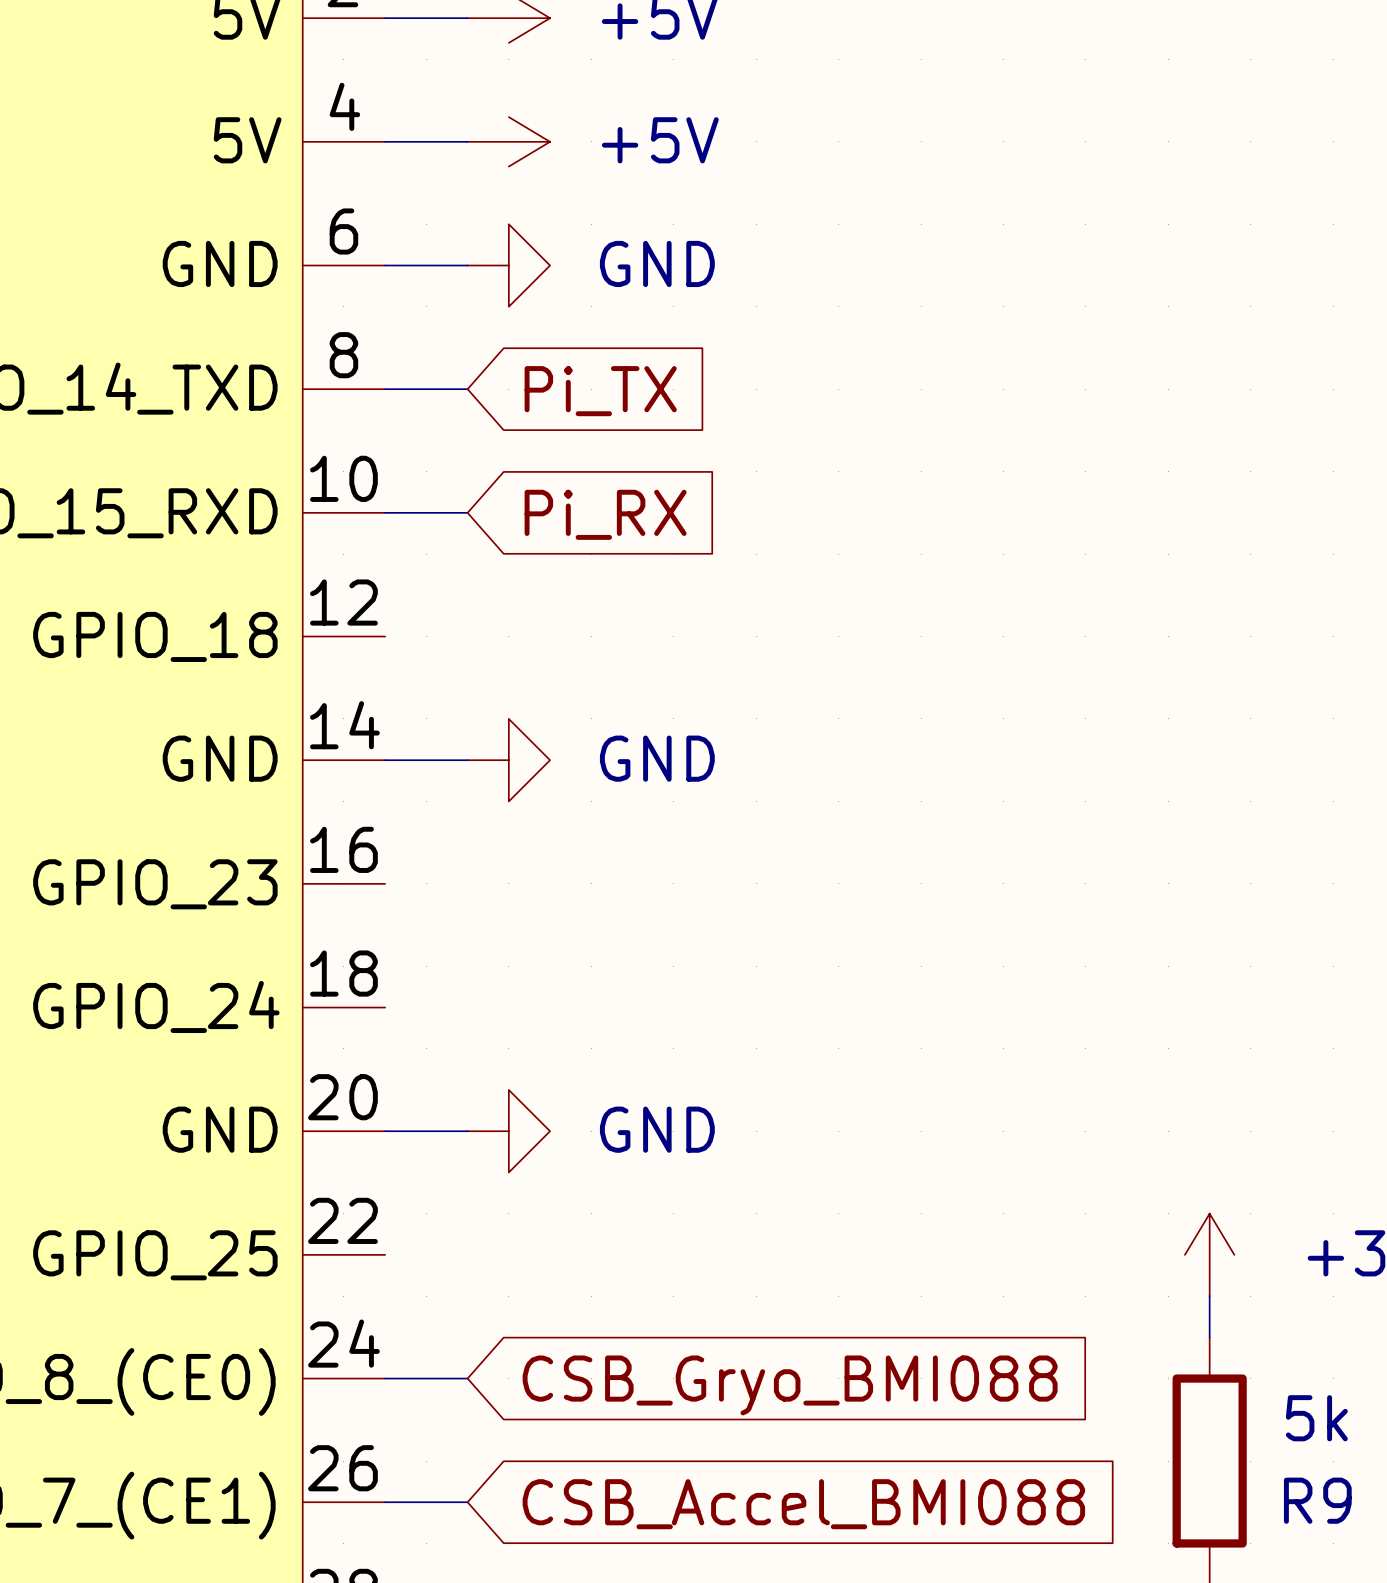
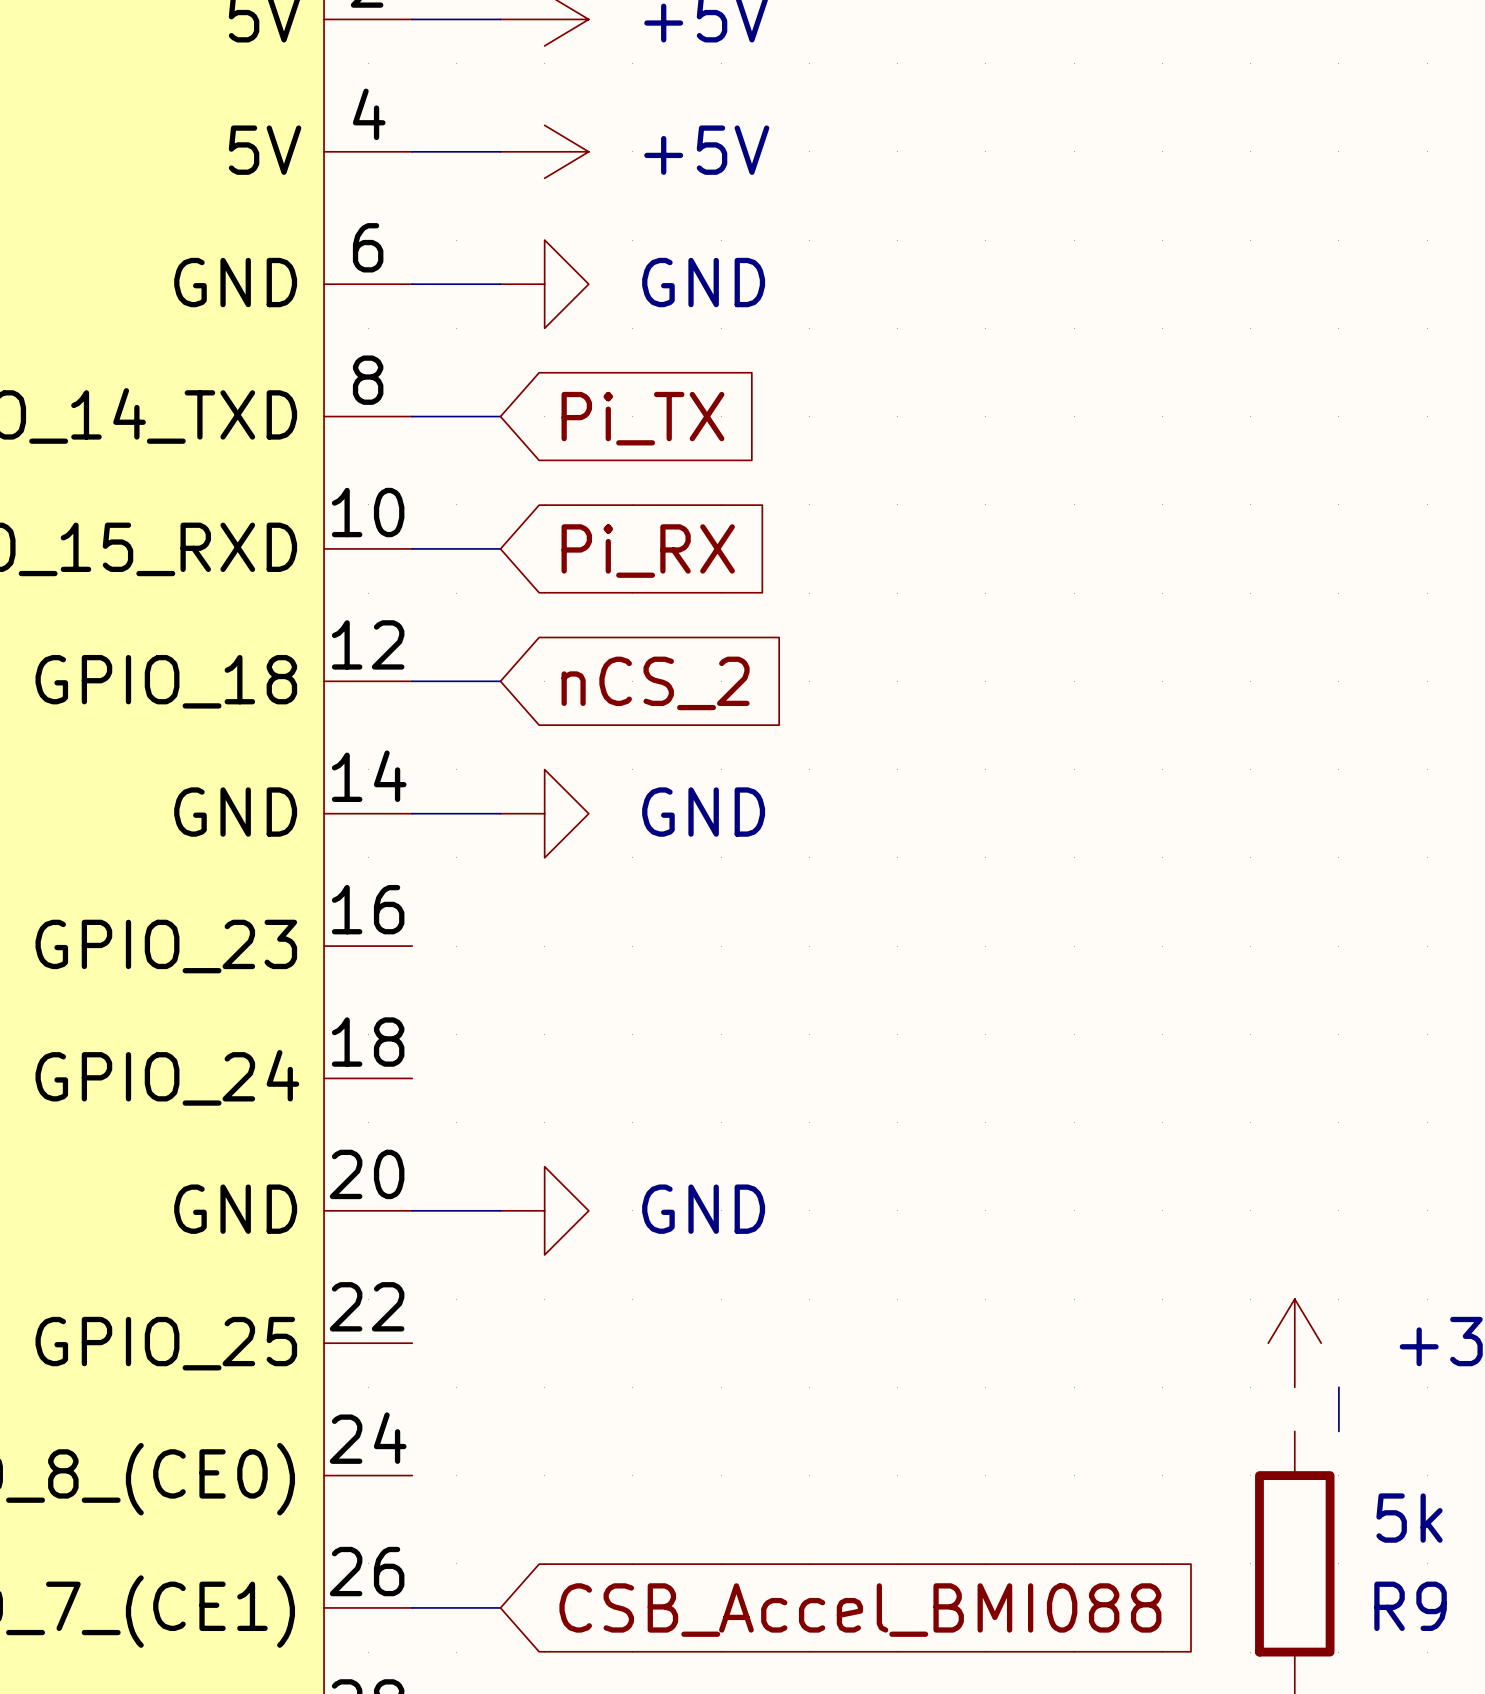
global label: none -> nCS_2 (655, 683)
wire: (1209, 1296) (1209, 1337) -> (1338, 1387) (1338, 1431)
wire: (385, 1378) (467, 1378) -> (412, 681) (500, 681)
global label: CSB_Gryo_BMI088 (790, 1385) -> none

